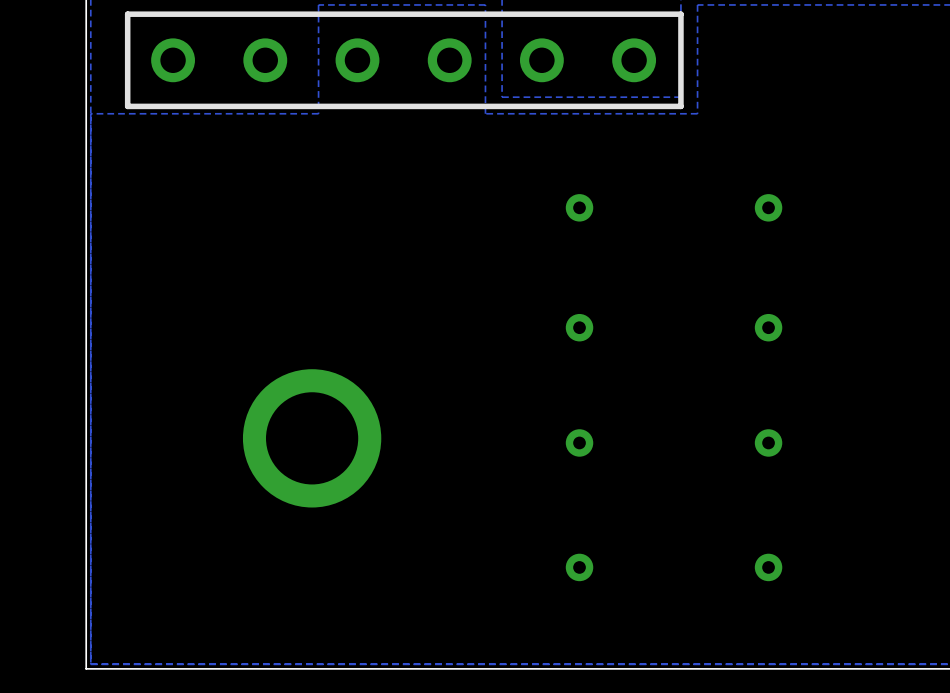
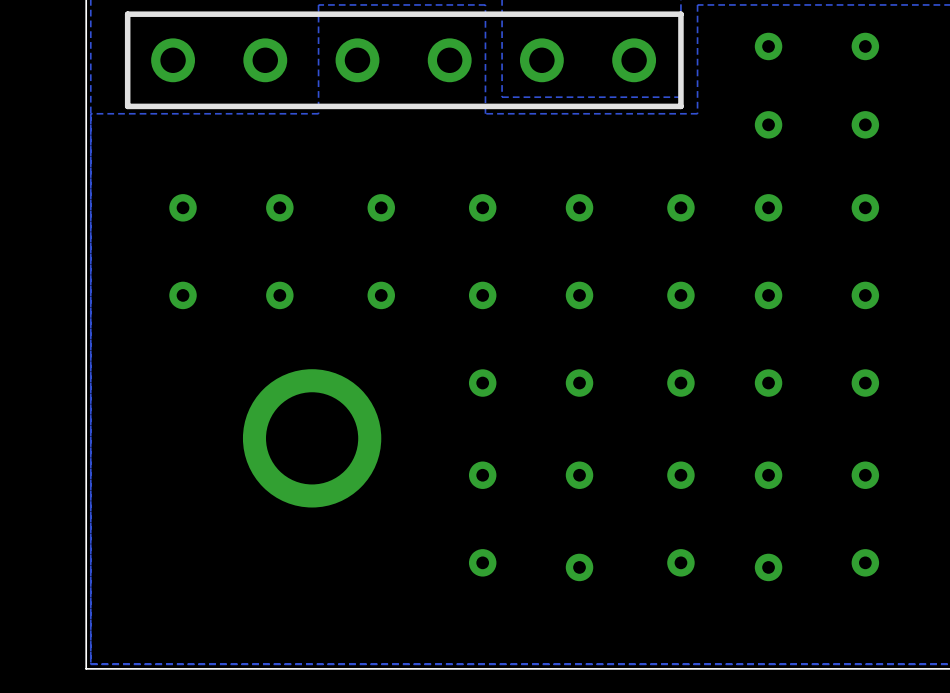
via: none -> (768, 46)
via: none -> (865, 46)
via: none -> (768, 124)
via: none -> (865, 124)
via: none -> (183, 207)
via: none -> (279, 207)
via: none -> (381, 207)
via: none -> (482, 207)
via: none -> (680, 207)
via: none -> (865, 207)
via: none -> (183, 295)
via: none -> (279, 295)
via: none -> (381, 295)
via: none -> (482, 295)
via: none -> (579, 295)
via: none -> (680, 295)
via: none -> (768, 295)
via: none -> (865, 295)
via: (579, 327) -> none
via: (768, 327) -> none
via: none -> (482, 383)
via: none -> (579, 383)
via: none -> (680, 383)
via: none -> (768, 383)
via: none -> (865, 383)
via: (579, 442) -> none
via: (768, 442) -> none
via: none -> (482, 475)
via: none -> (579, 475)
via: none -> (680, 475)
via: none -> (768, 475)
via: none -> (865, 475)
via: none -> (482, 562)
via: none -> (680, 562)
via: none -> (865, 562)

